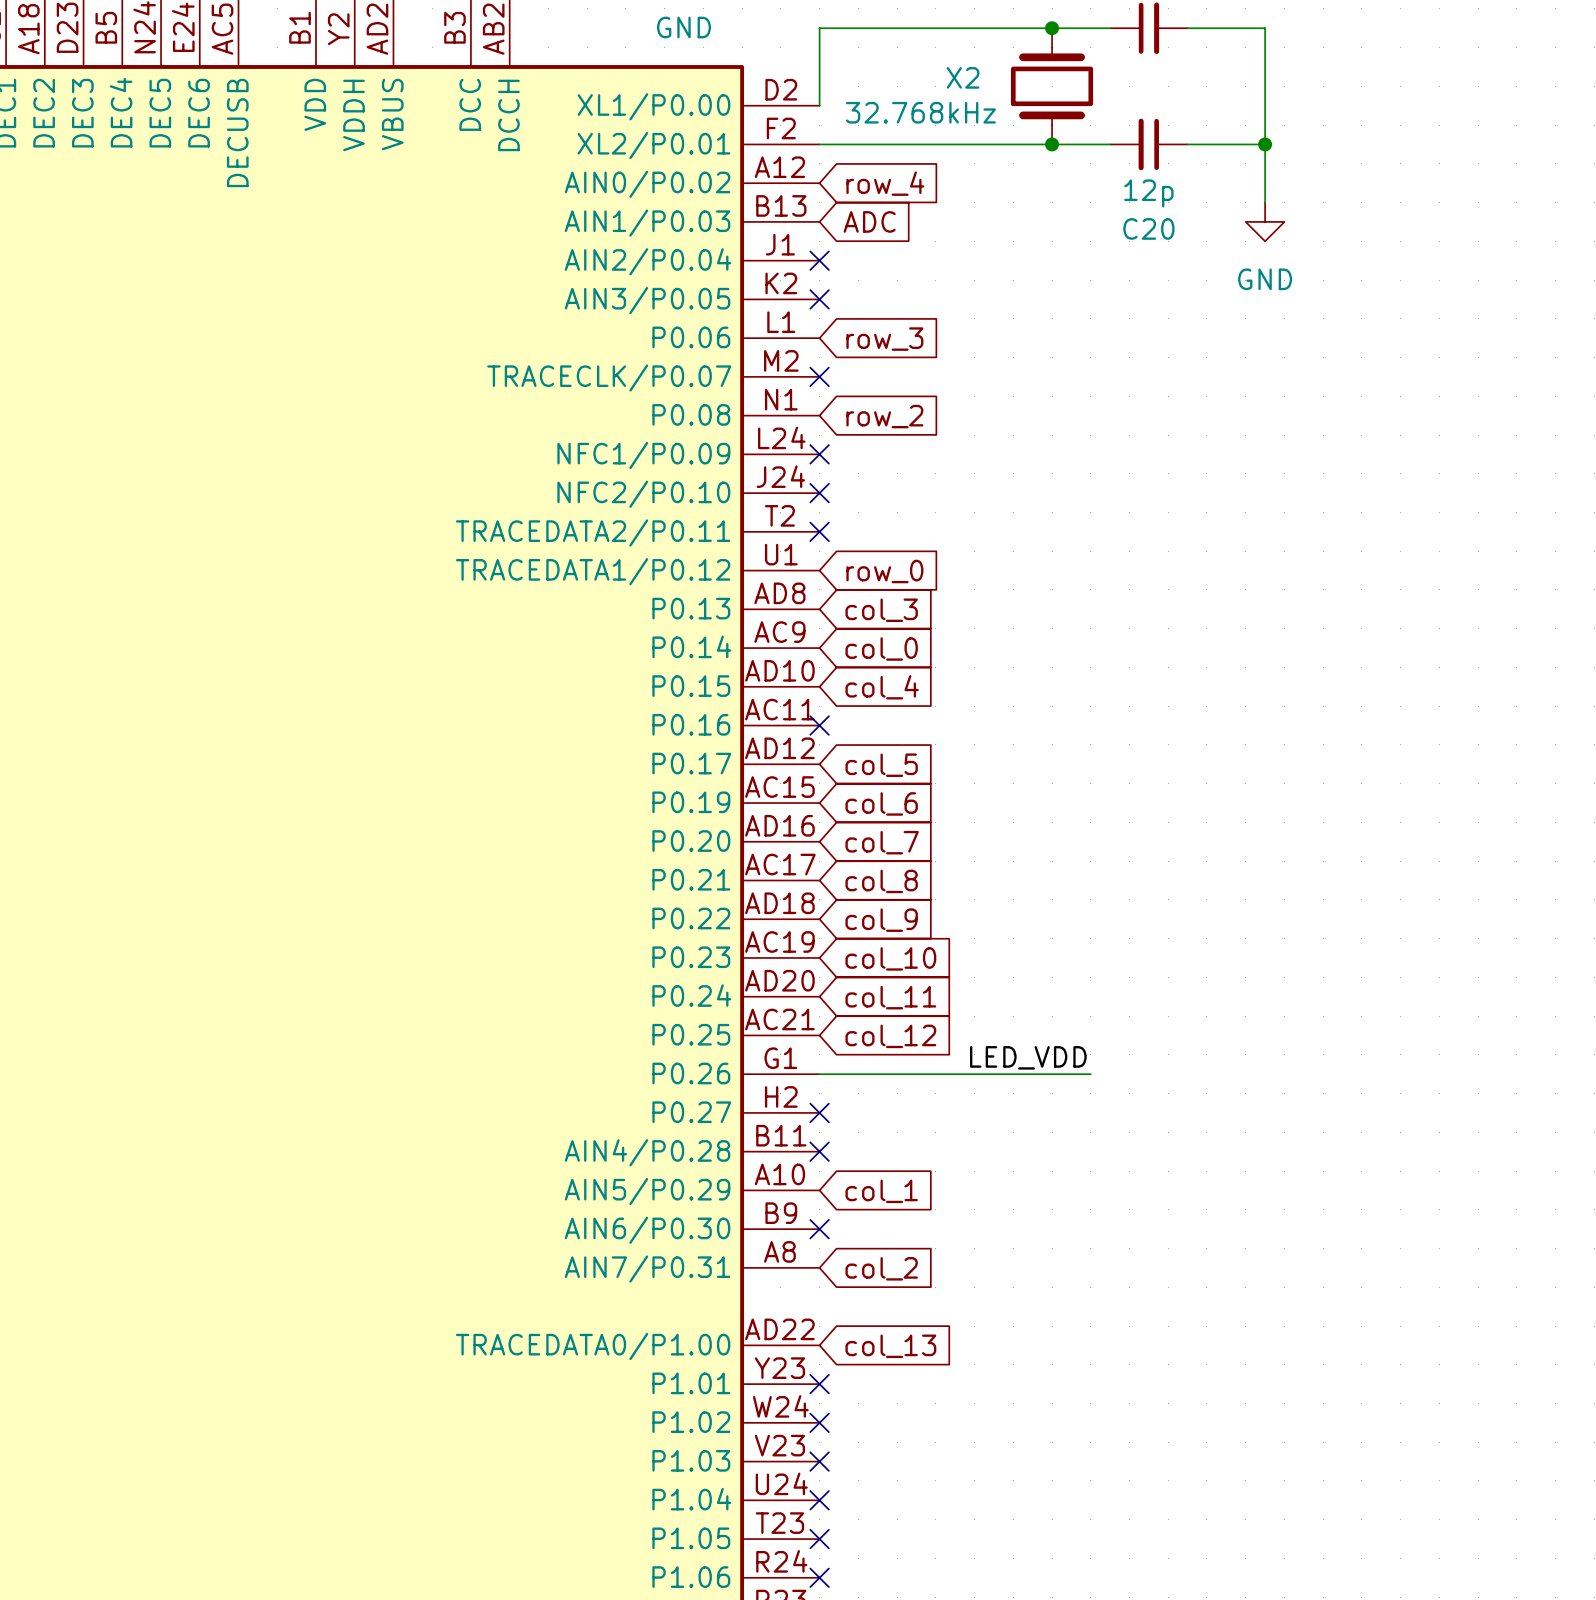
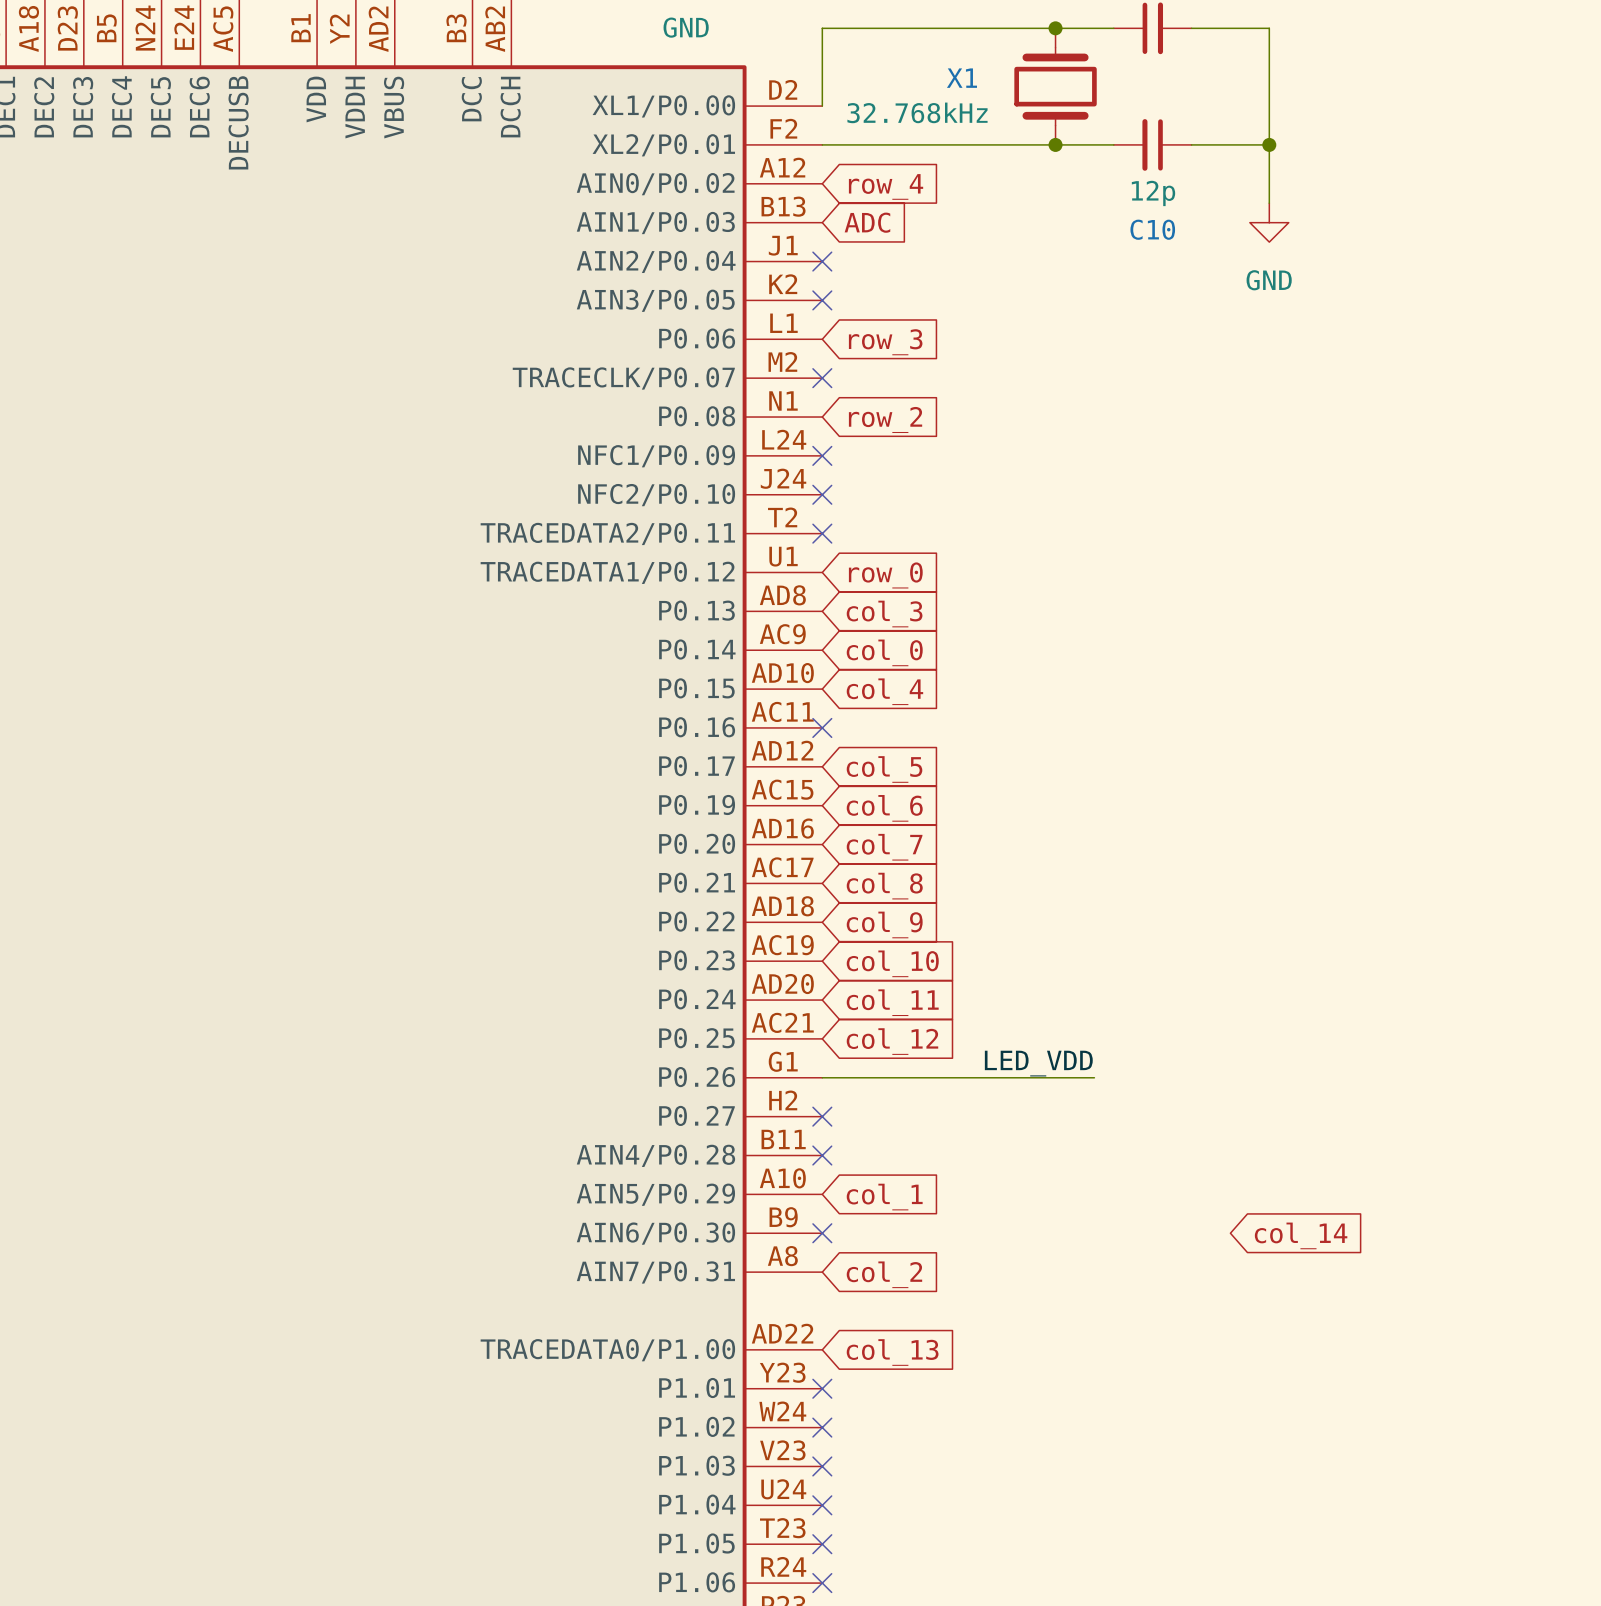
X2 name: X2 (963, 77) -> X1 (961, 78)
C20 name: C20 (1148, 228) -> C10 (1152, 229)
global label: none -> col_14 (1301, 1235)

